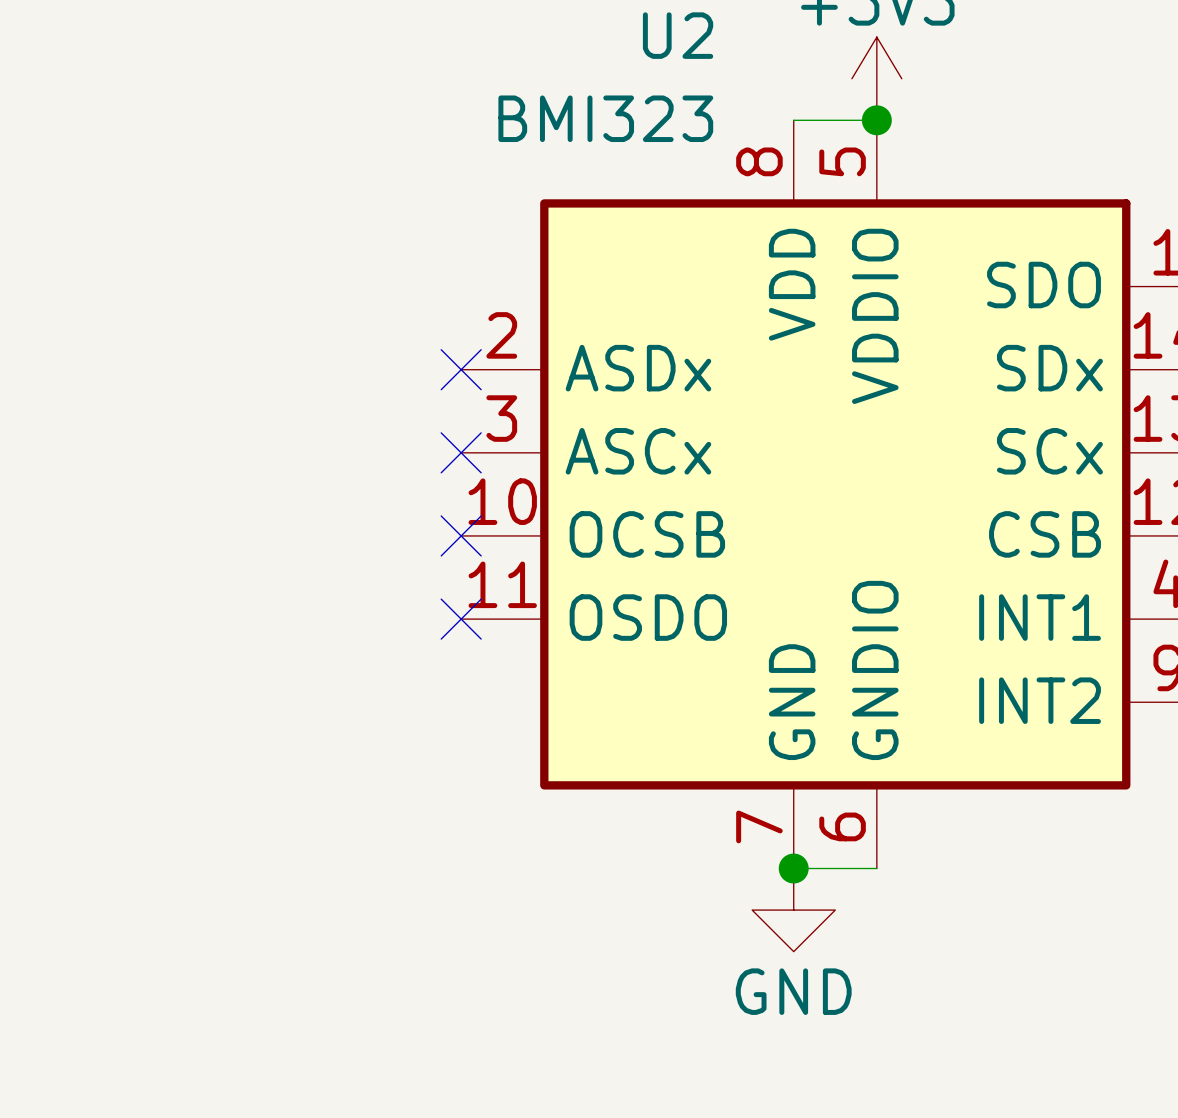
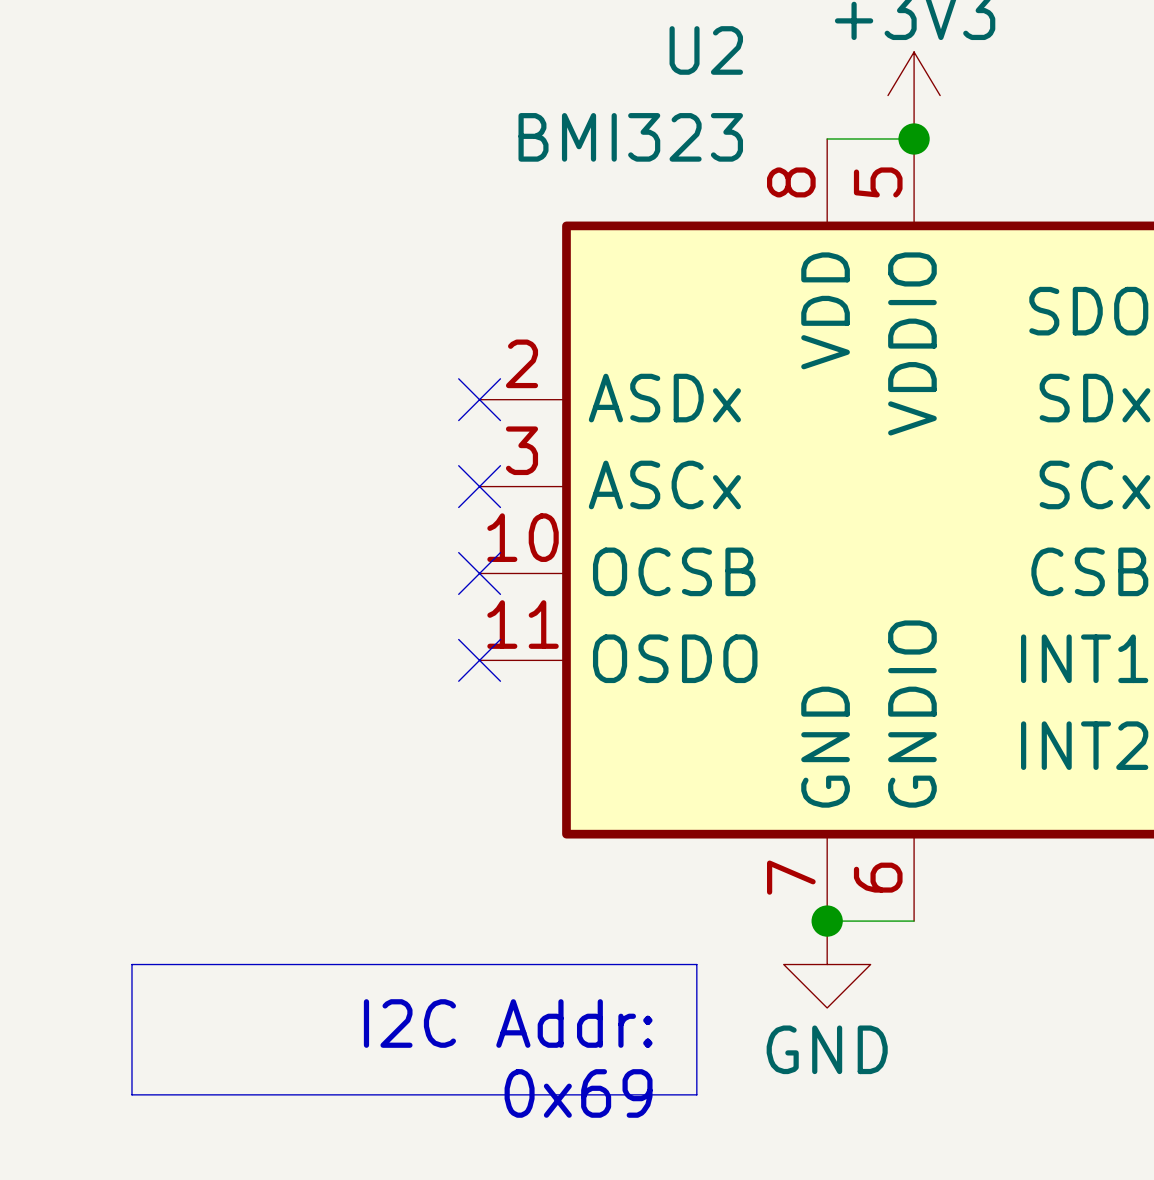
line: none -> (131, 964) (696, 964) (696, 1094) (131, 1094) (131, 964)
text: none -> I2C Addr: (508, 1023)
text: none -> 0x69 (578, 1093)

